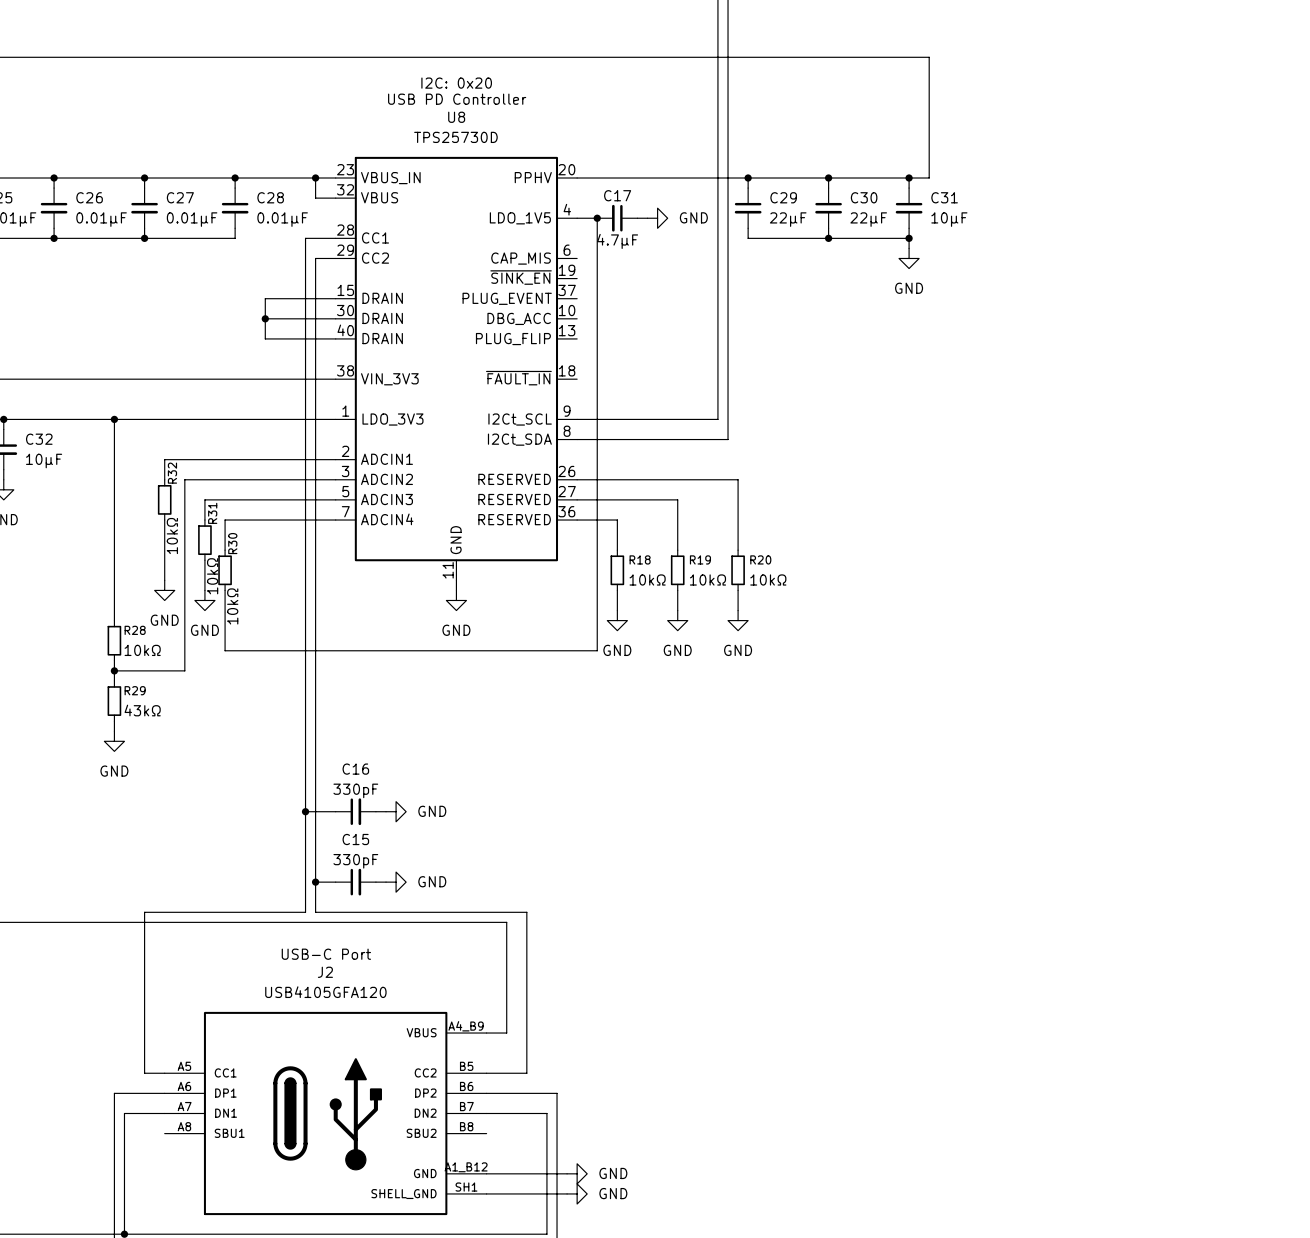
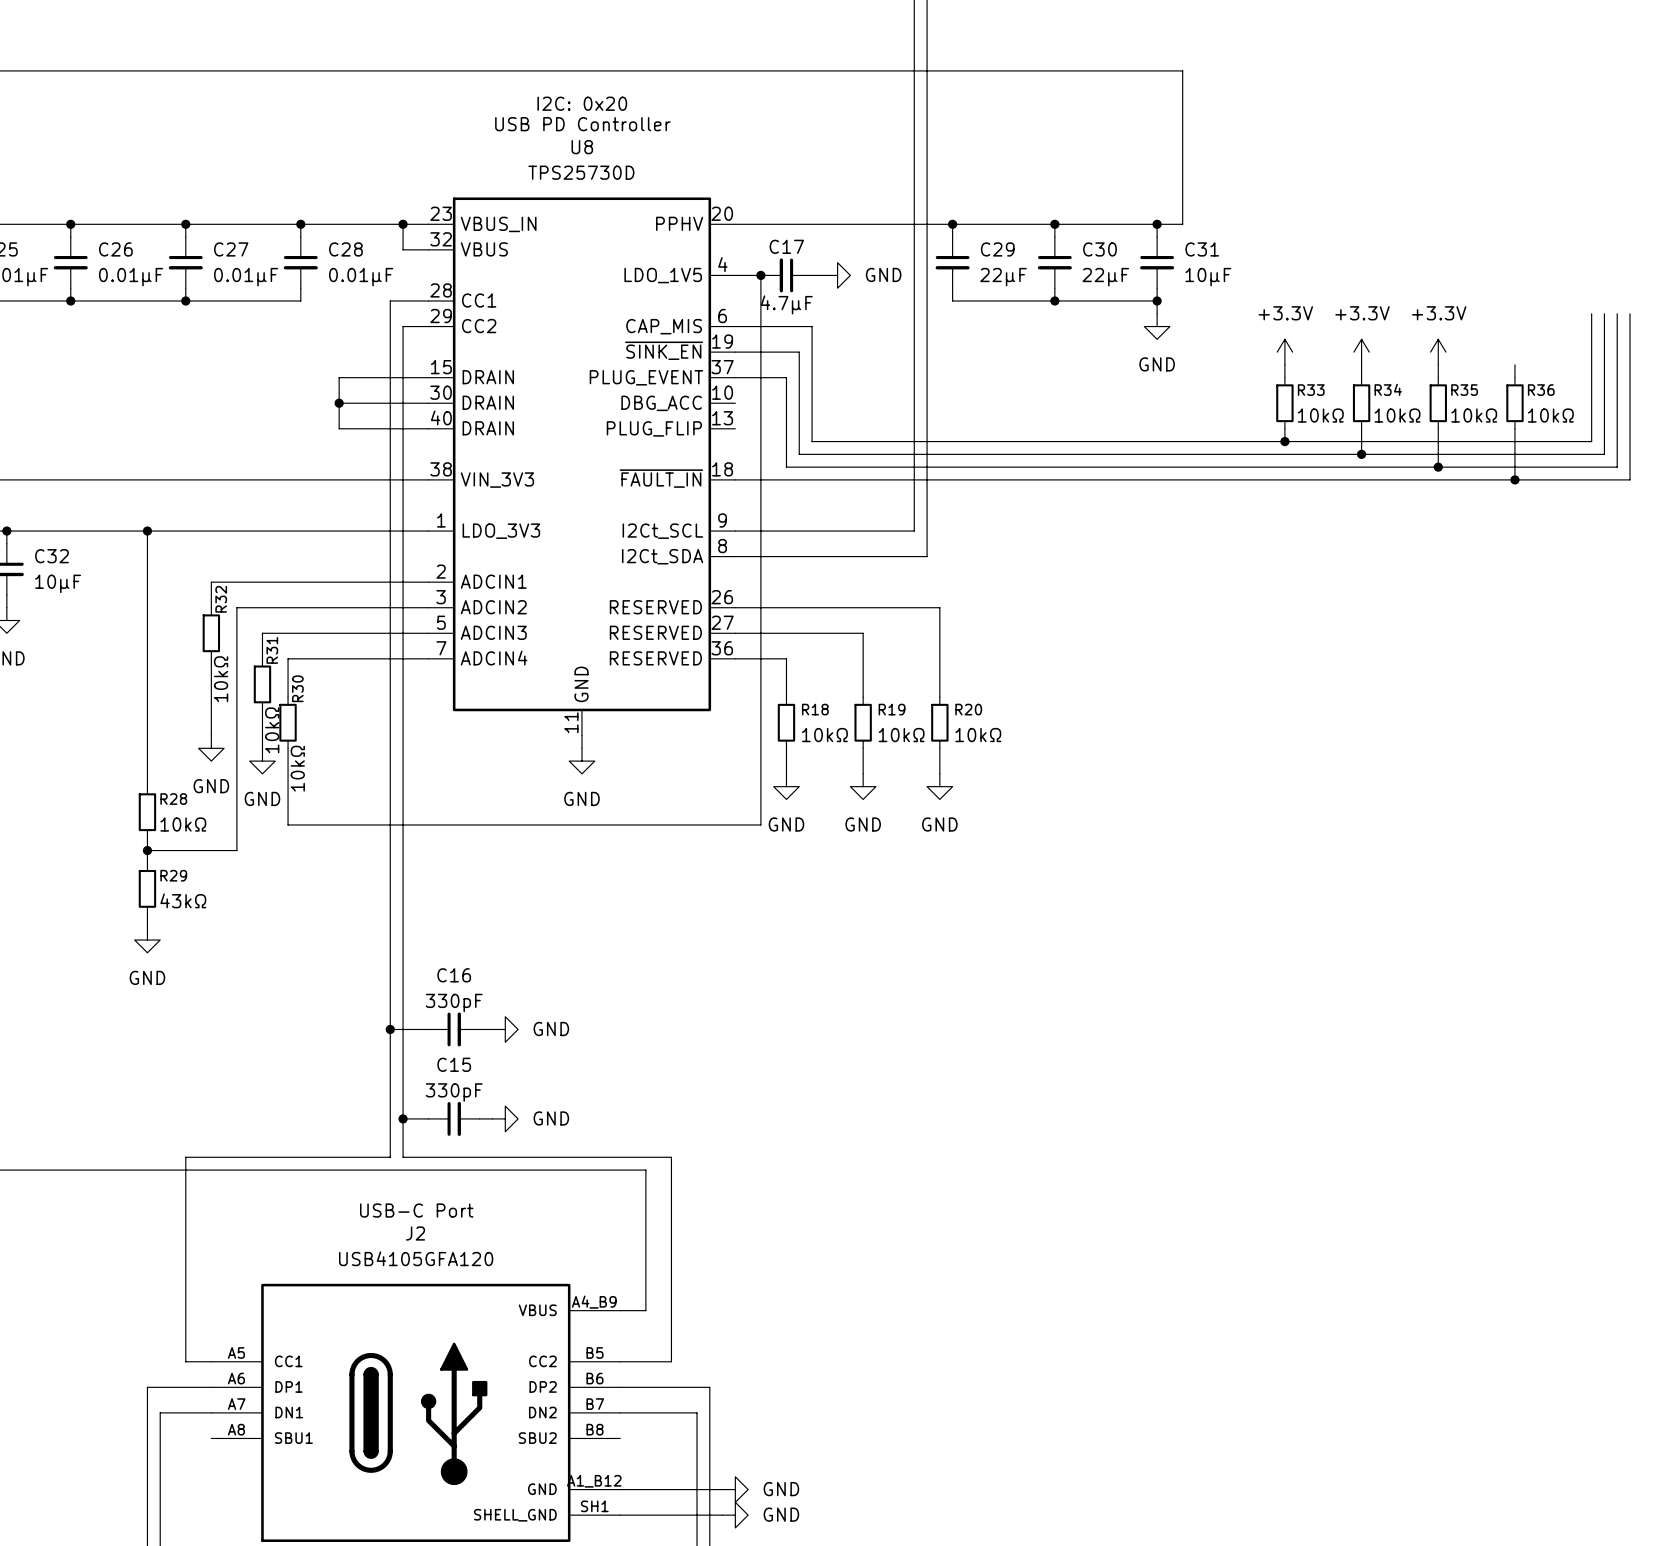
wire: none -> (1591, 313) (1591, 441) (812, 441) (812, 326) (735, 326)
wire: none -> (1604, 313) (1604, 454) (799, 454) (799, 352) (735, 352)
wire: none -> (1617, 313) (1617, 467) (786, 467) (786, 377) (735, 377)
wire: none -> (1629, 313) (1629, 479) (735, 479)
power symbol: none -> +3.3V (1284, 352)
power symbol: none -> +3.3V (1361, 352)
power symbol: none -> +3.3V (1438, 352)
wire: none -> (1284, 364) (1284, 377)
wire: none -> (1361, 364) (1361, 377)
wire: none -> (1438, 364) (1438, 377)
wire: none -> (1514, 364) (1514, 377)
R33: none -> 10kΩ (1284, 403)
R34: none -> 10kΩ (1361, 403)
R35: none -> 10kΩ (1438, 403)
R36: none -> 10kΩ (1514, 403)
wire: none -> (1284, 428) (1284, 441)
wire: none -> (1361, 428) (1361, 454)
wire: none -> (1438, 428) (1438, 467)
wire: none -> (1514, 428) (1514, 479)
junction: none -> (1284, 441)
junction: none -> (1361, 454)
junction: none -> (1438, 467)
junction: none -> (1514, 479)

